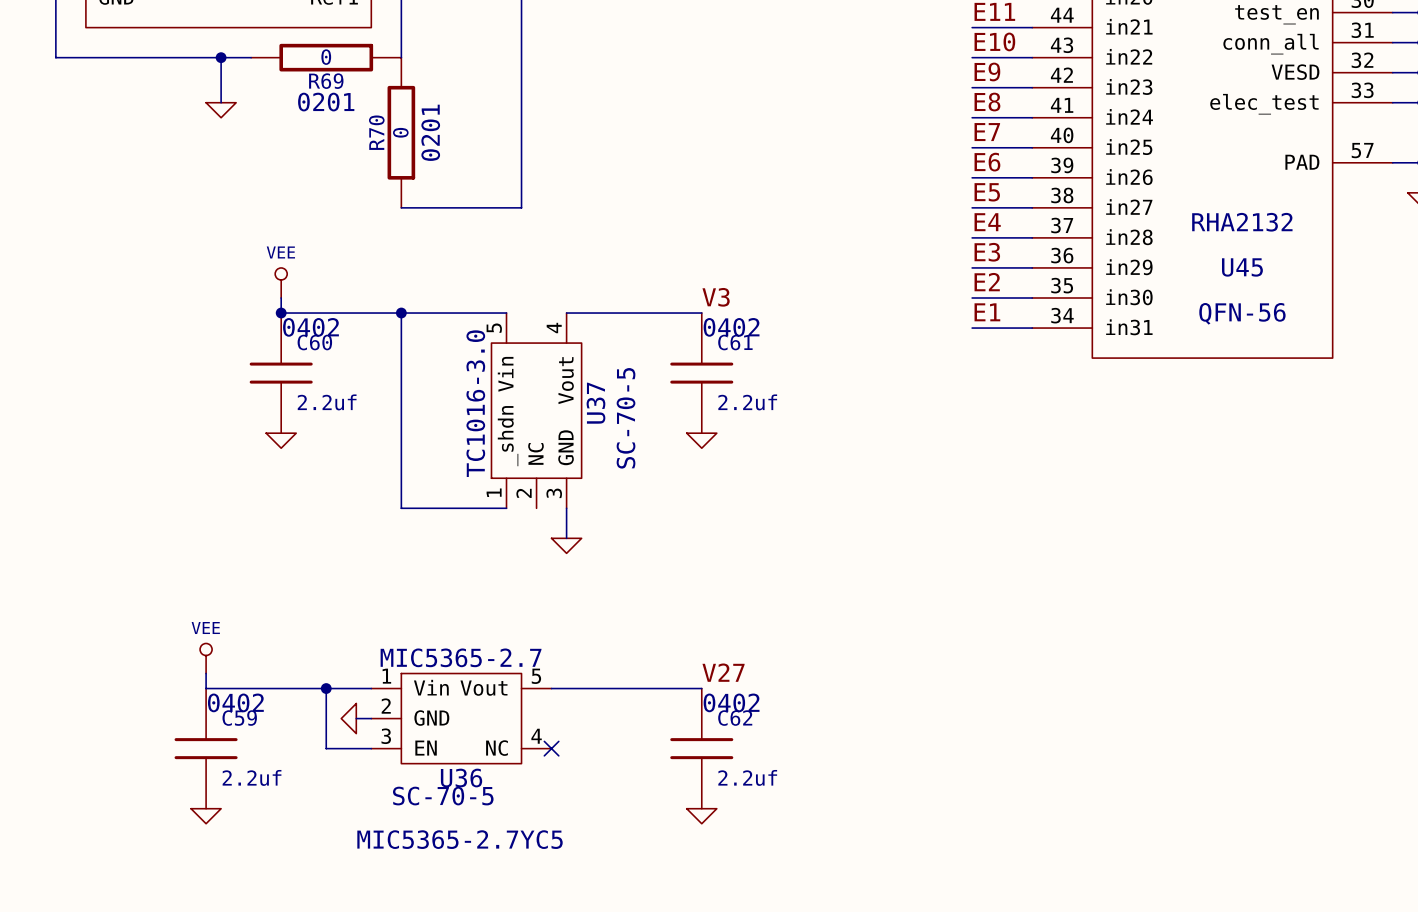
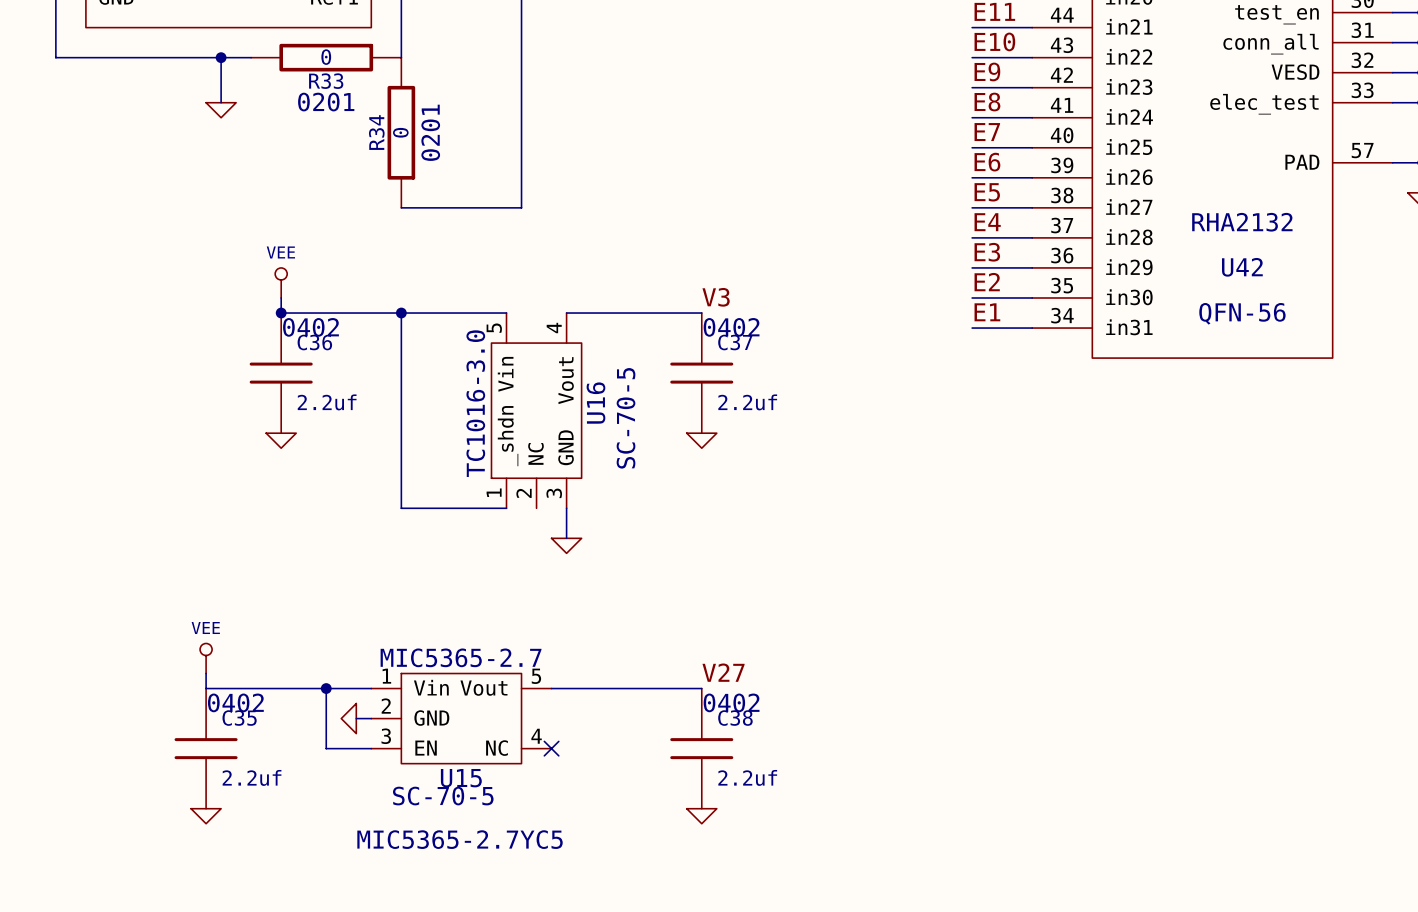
R69 name: R69 (326, 81) -> R33 (326, 81)
R70 name: R70 (376, 132) -> R34 (376, 132)
U45 name: U45 (1242, 267) -> U42 (1242, 267)
C60 name: C60 (314, 342) -> C36 (314, 342)
C61 name: C61 (735, 342) -> C37 (735, 342)
U37 name: U37 (595, 403) -> U16 (595, 403)
C59 name: C59 (239, 718) -> C35 (239, 718)
C62 name: C62 (735, 718) -> C38 (735, 718)
U36 name: U36 (461, 778) -> U15 (461, 778)

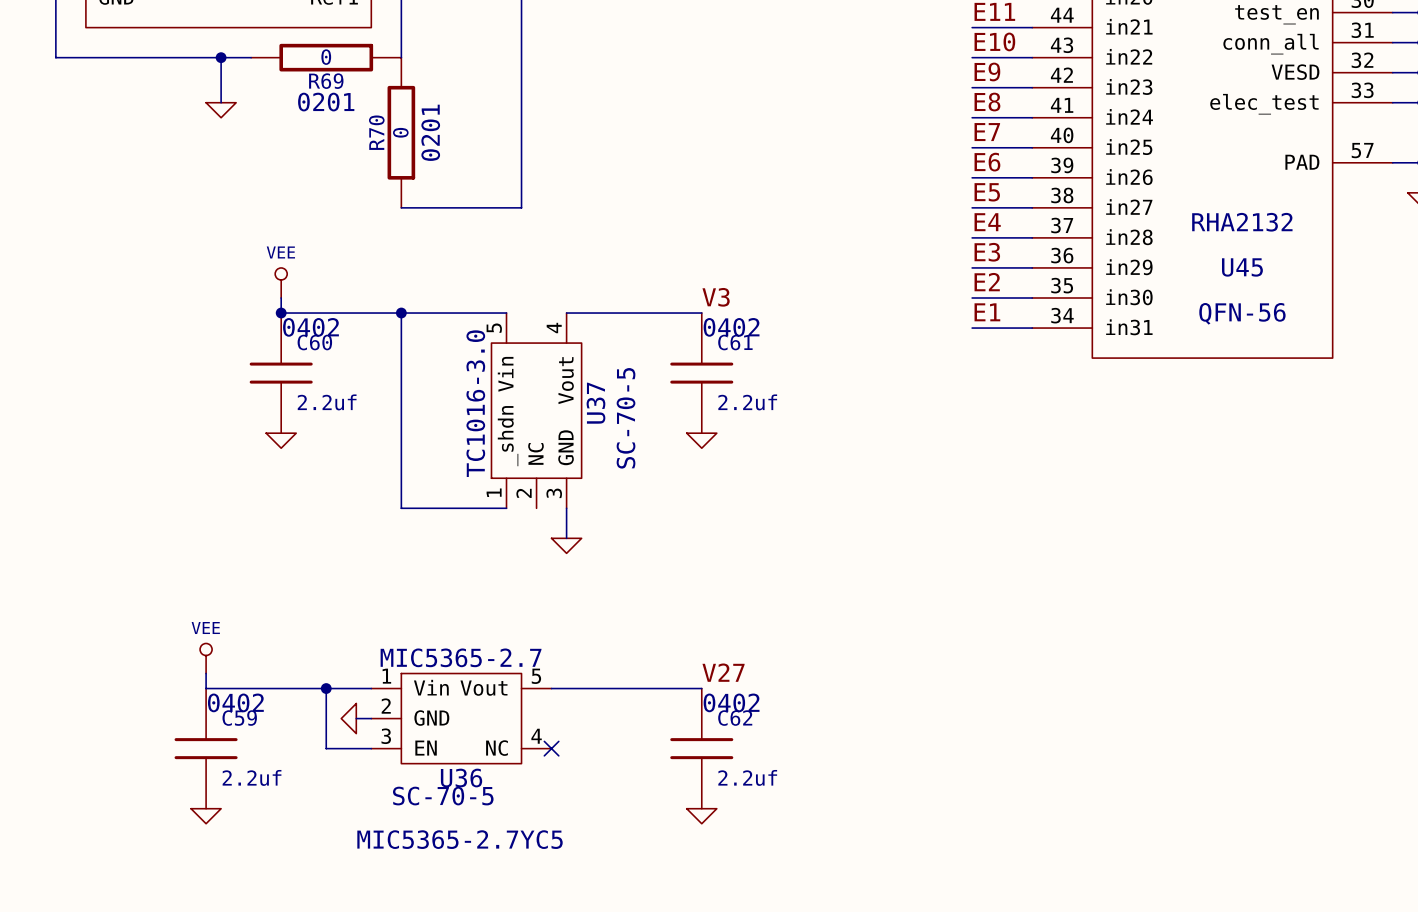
R33 name: R33 (326, 81) -> R69 (326, 81)
R34 name: R34 (376, 132) -> R70 (376, 132)
U42 name: U42 (1242, 267) -> U45 (1242, 267)
C36 name: C36 (314, 342) -> C60 (314, 342)
C37 name: C37 (735, 342) -> C61 (735, 342)
U16 name: U16 (595, 403) -> U37 (595, 403)
C35 name: C35 (239, 718) -> C59 (239, 718)
C38 name: C38 (735, 718) -> C62 (735, 718)
U15 name: U15 (461, 778) -> U36 (461, 778)

